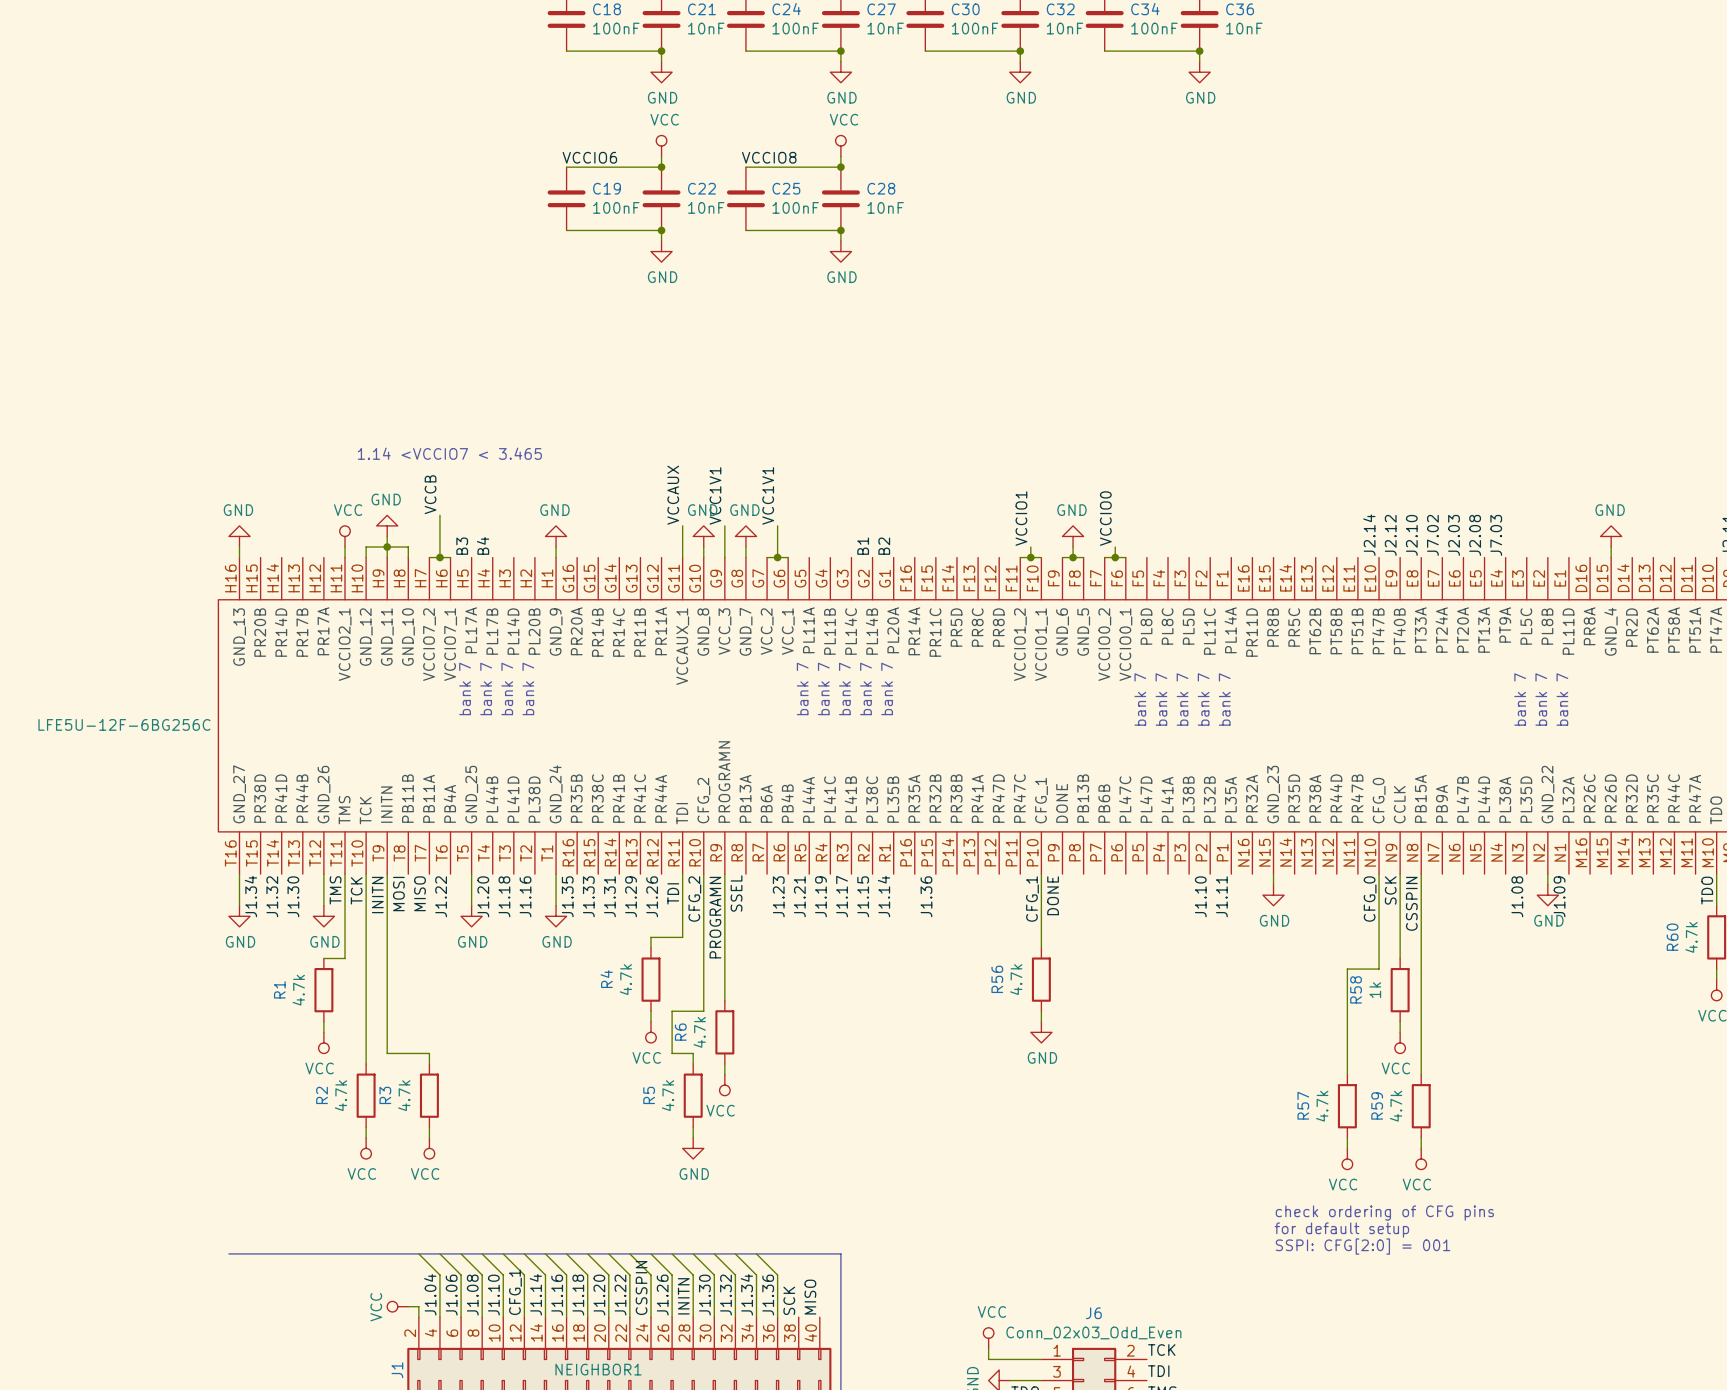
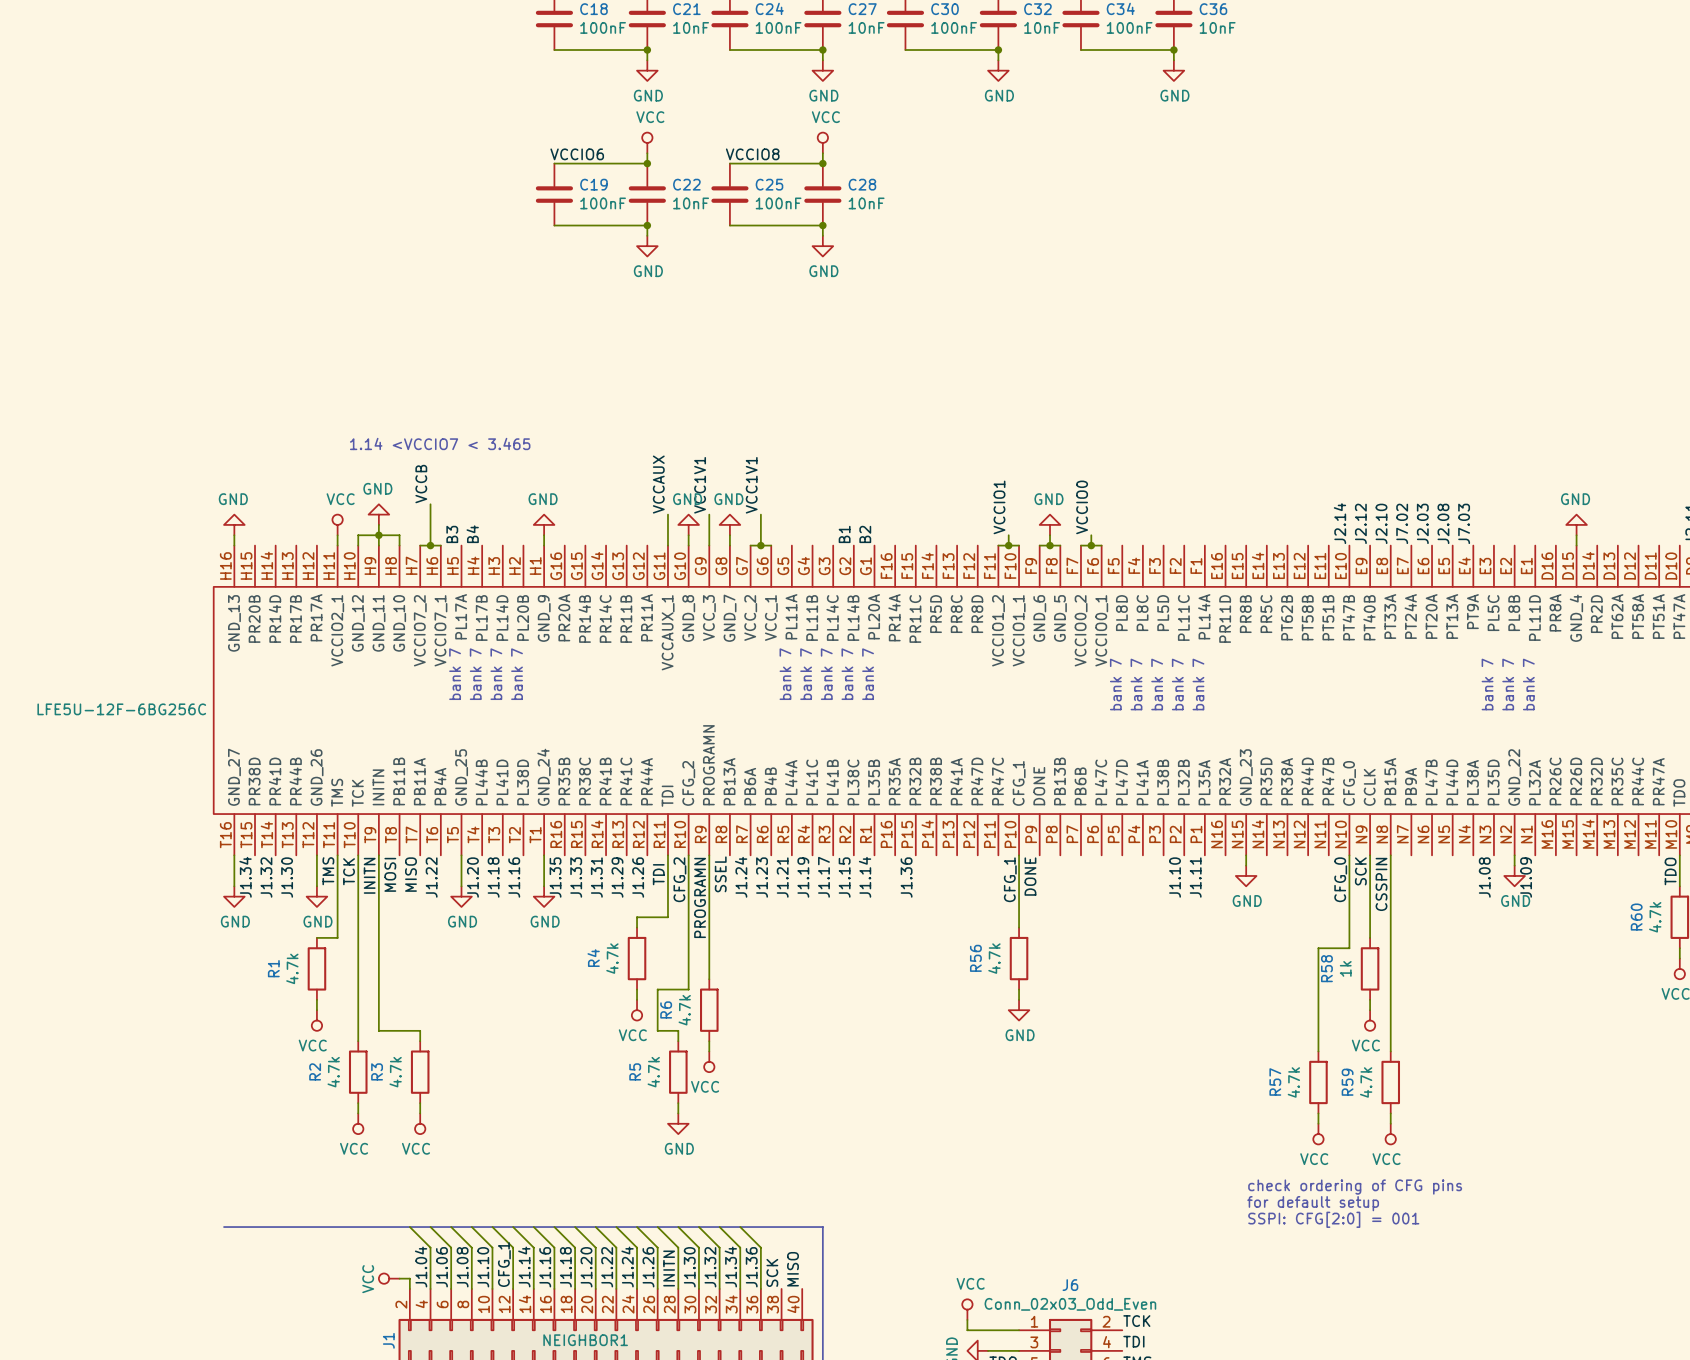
label: none -> J1.24 (741, 877)
label: CSSPIN (641, 1288) -> J1.24 (627, 1267)

